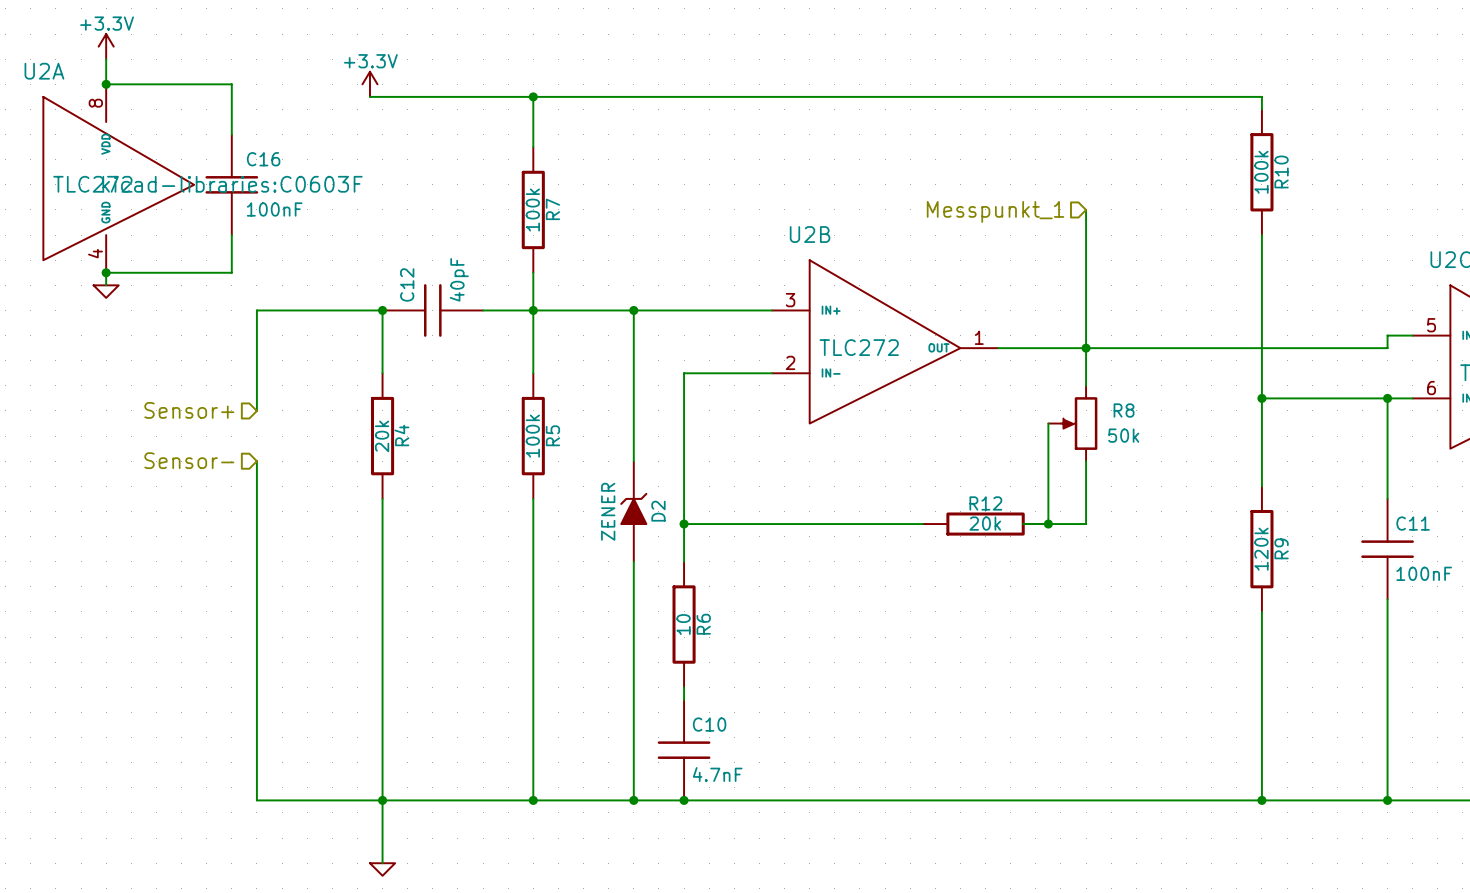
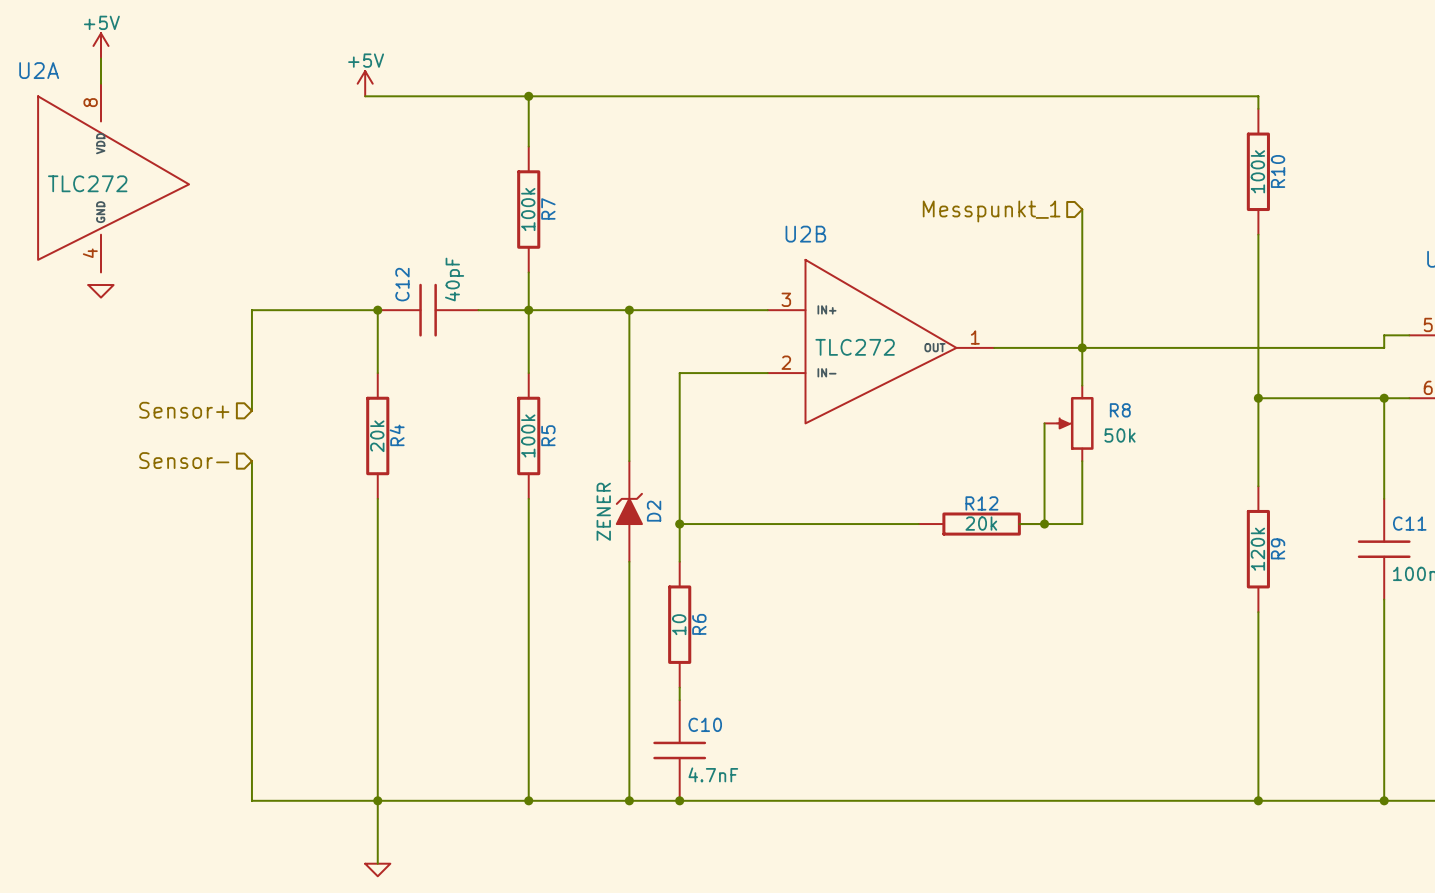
power symbol: +3.3V (106, 46) -> +5V (101, 45)
wire: (106, 84) (231, 84) (231, 134) -> none
junction: (106, 84) -> none
power symbol: +3.3V (369, 84) -> +5V (365, 83)
C16: 100nF (231, 184) -> none
wire: (231, 235) (231, 272) (106, 272) (106, 285) -> none
junction: (106, 272) -> none

